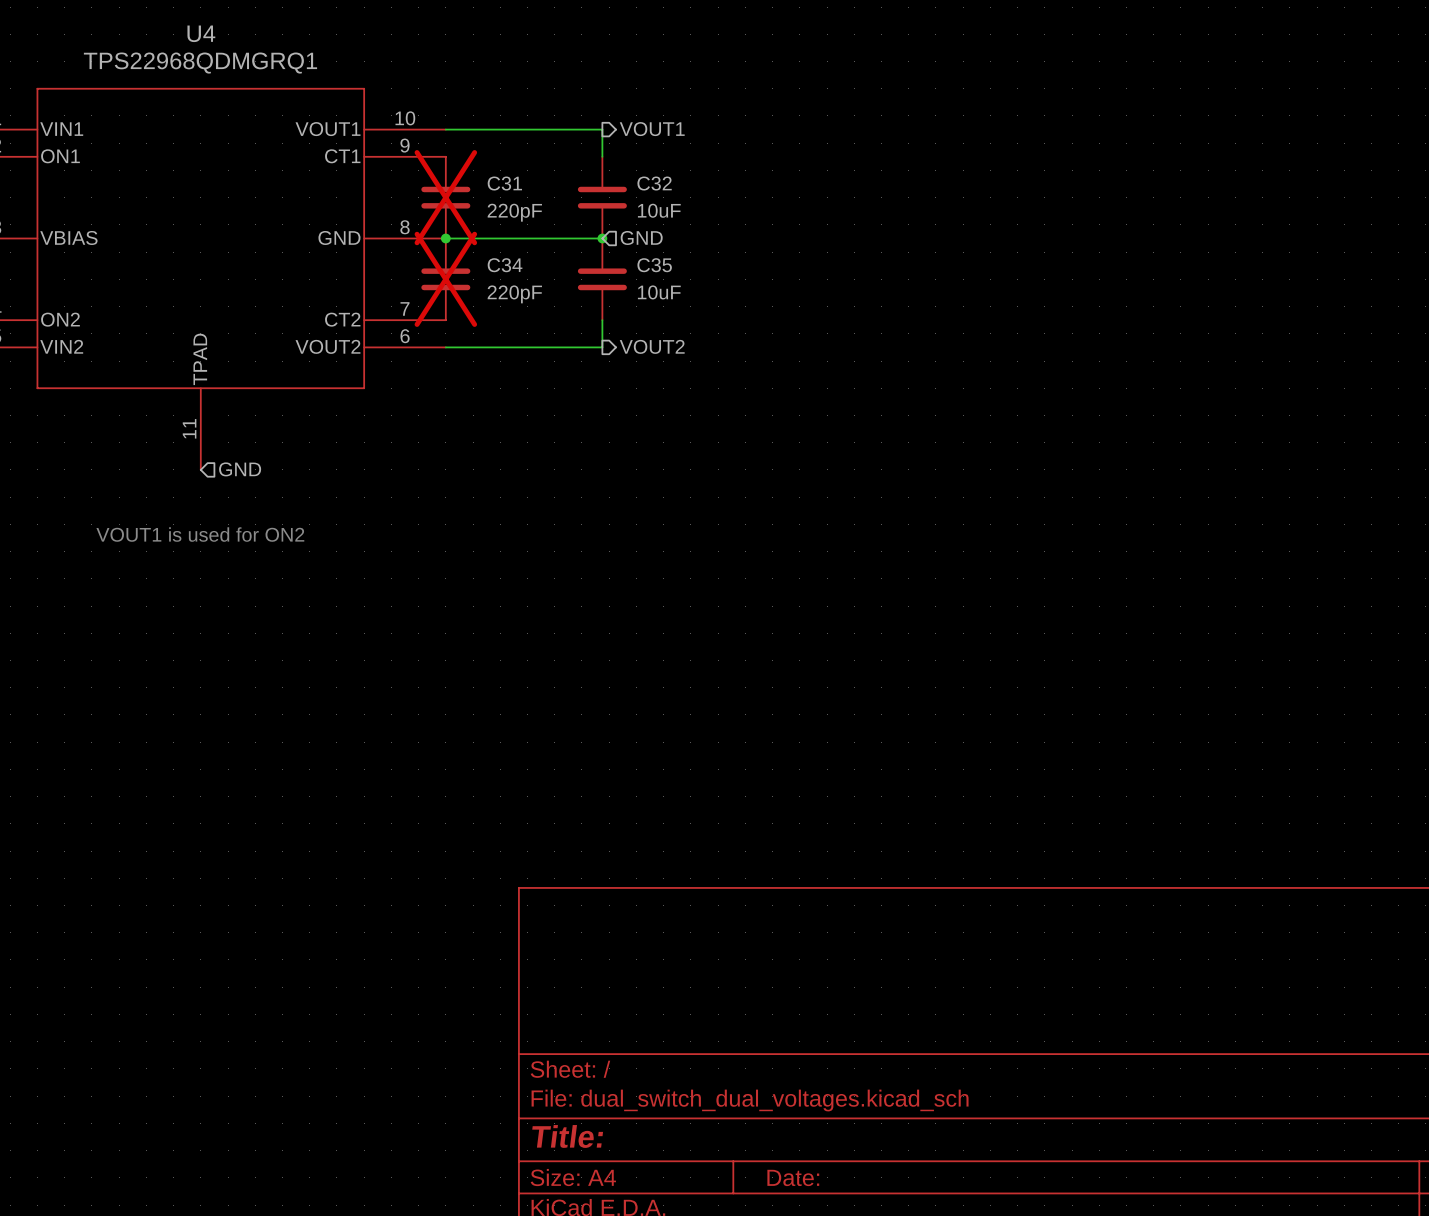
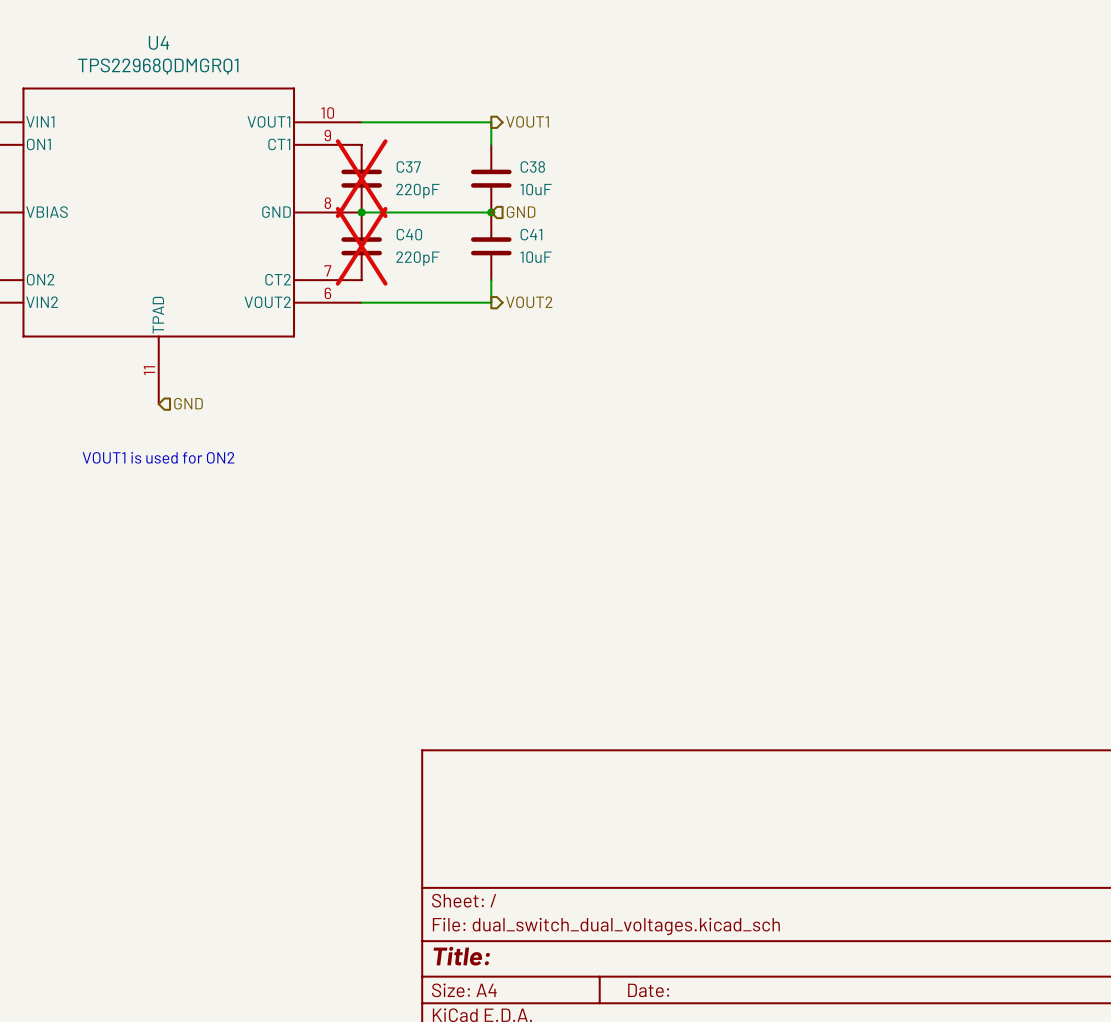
C31 name: C31 (504, 183) -> C37 (408, 166)
C32 name: C32 (654, 183) -> C38 (532, 166)
C34 name: C34 (505, 265) -> C40 (409, 234)
C35 name: C35 (654, 265) -> C41 (531, 234)

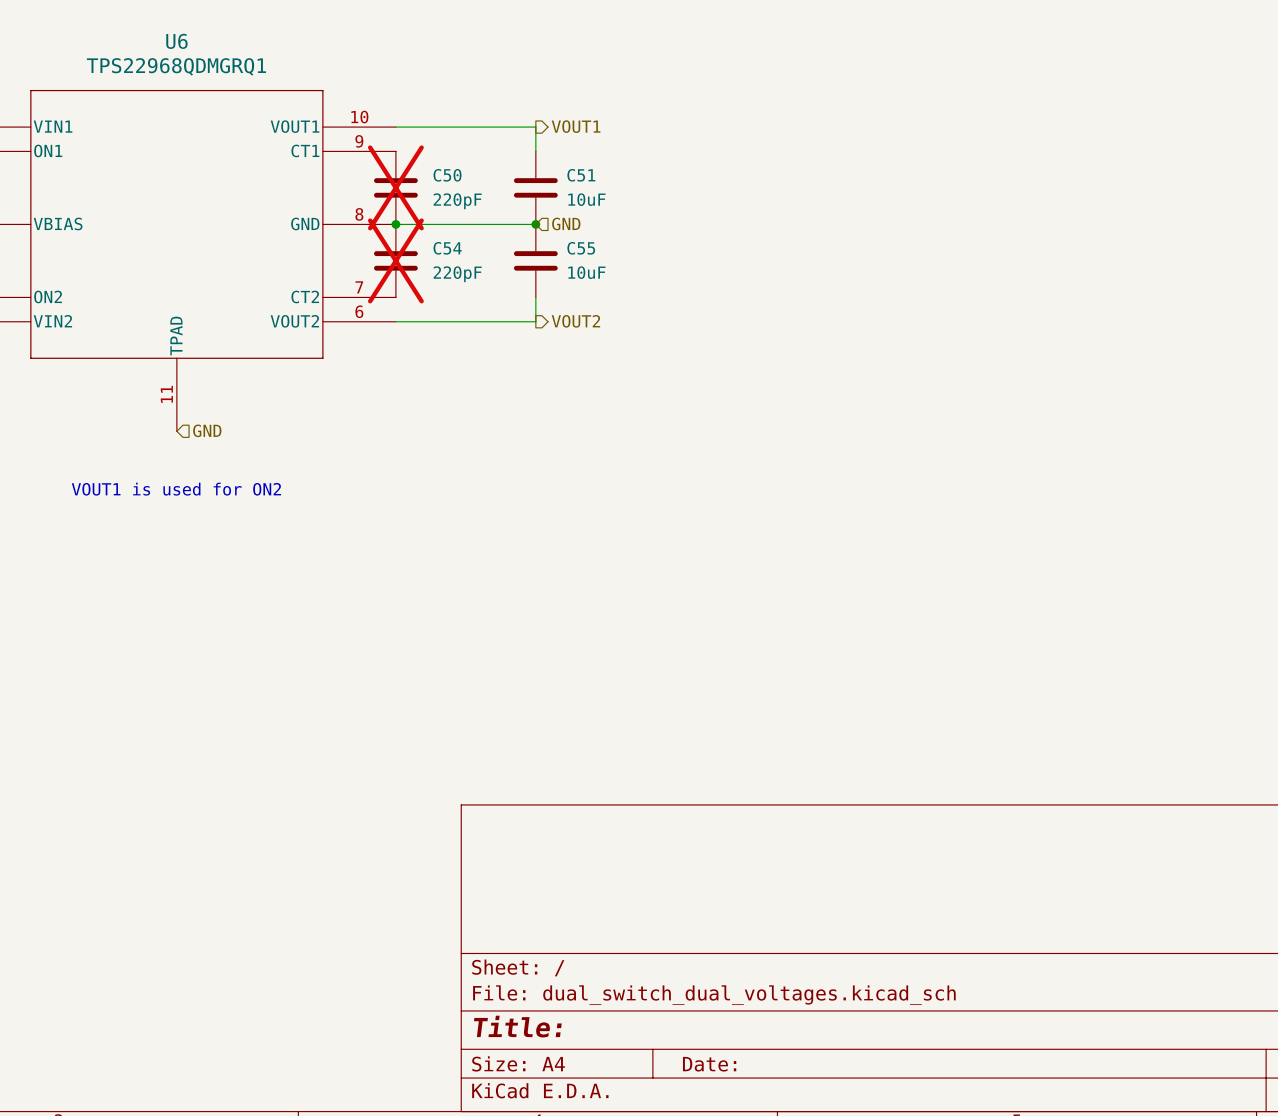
U4 name: U4 (158, 42) -> U6 (176, 41)
C37 name: C37 (408, 166) -> C50 (447, 175)
C38 name: C38 (532, 166) -> C51 (581, 175)
C40 name: C40 (409, 234) -> C54 (447, 248)
C41 name: C41 (531, 234) -> C55 (581, 248)

